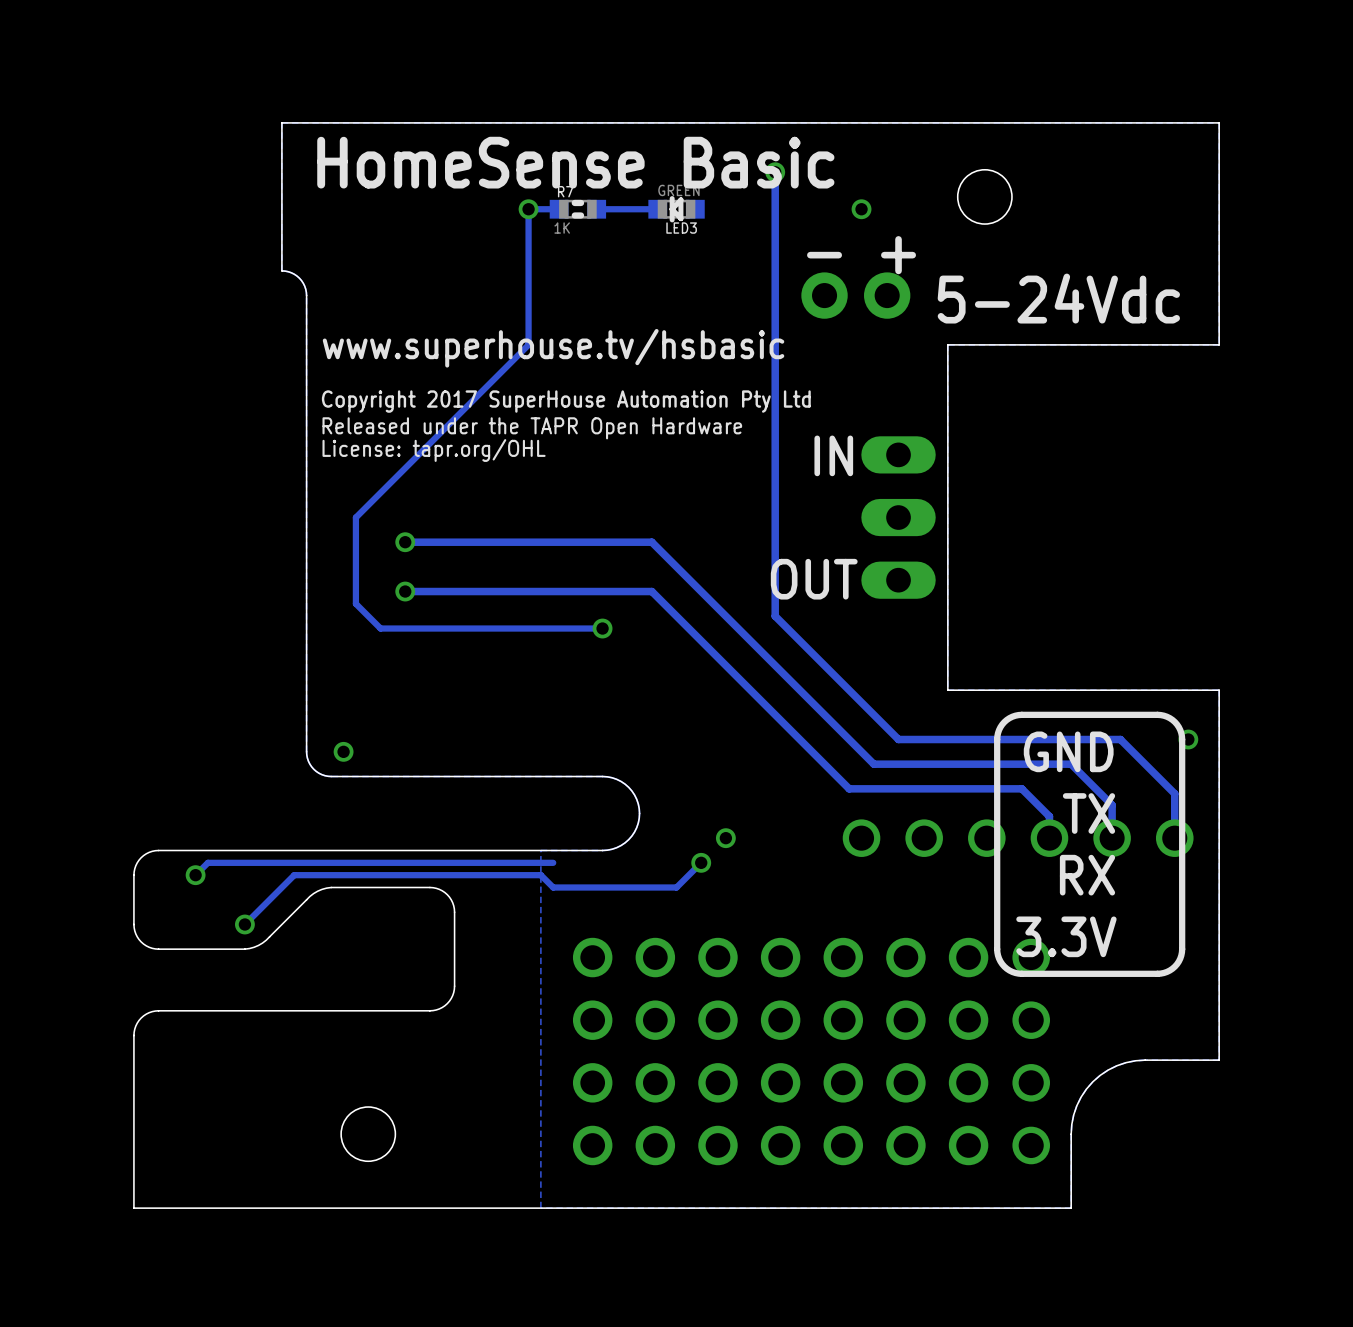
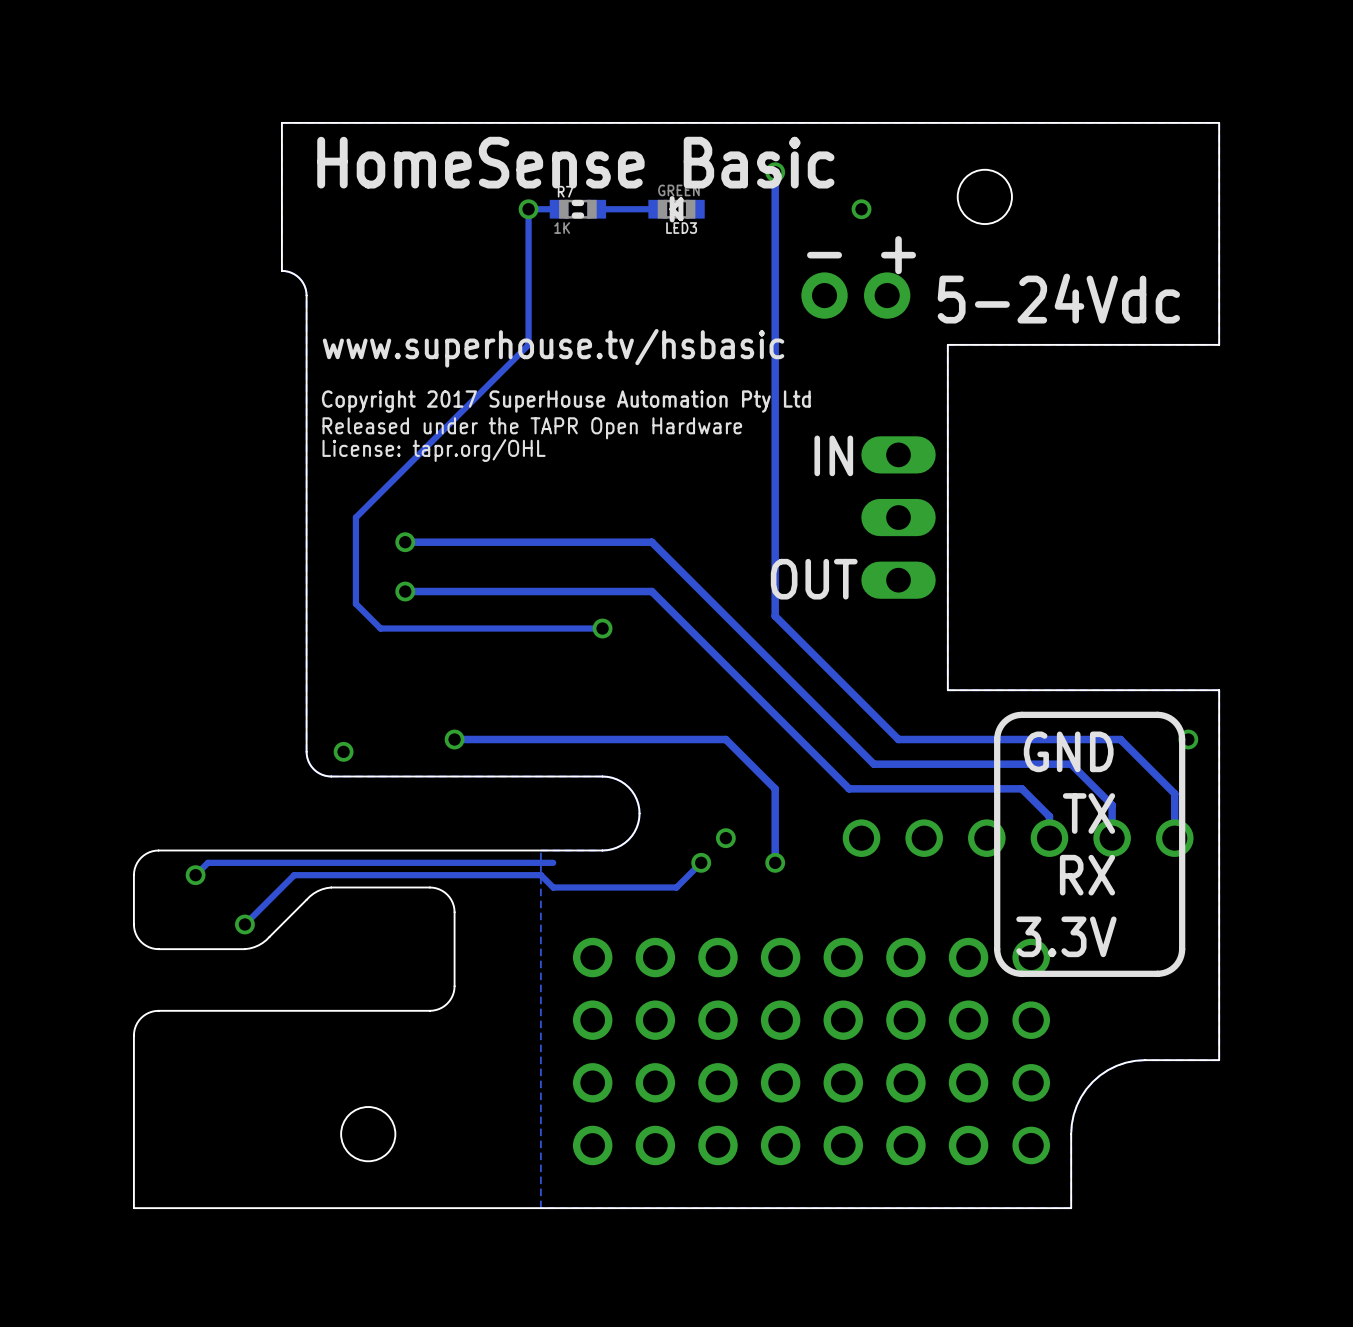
track: none -> (454, 739) (725, 739) (775, 788) (775, 862)
via: none -> (454, 739)
via: none -> (775, 862)

